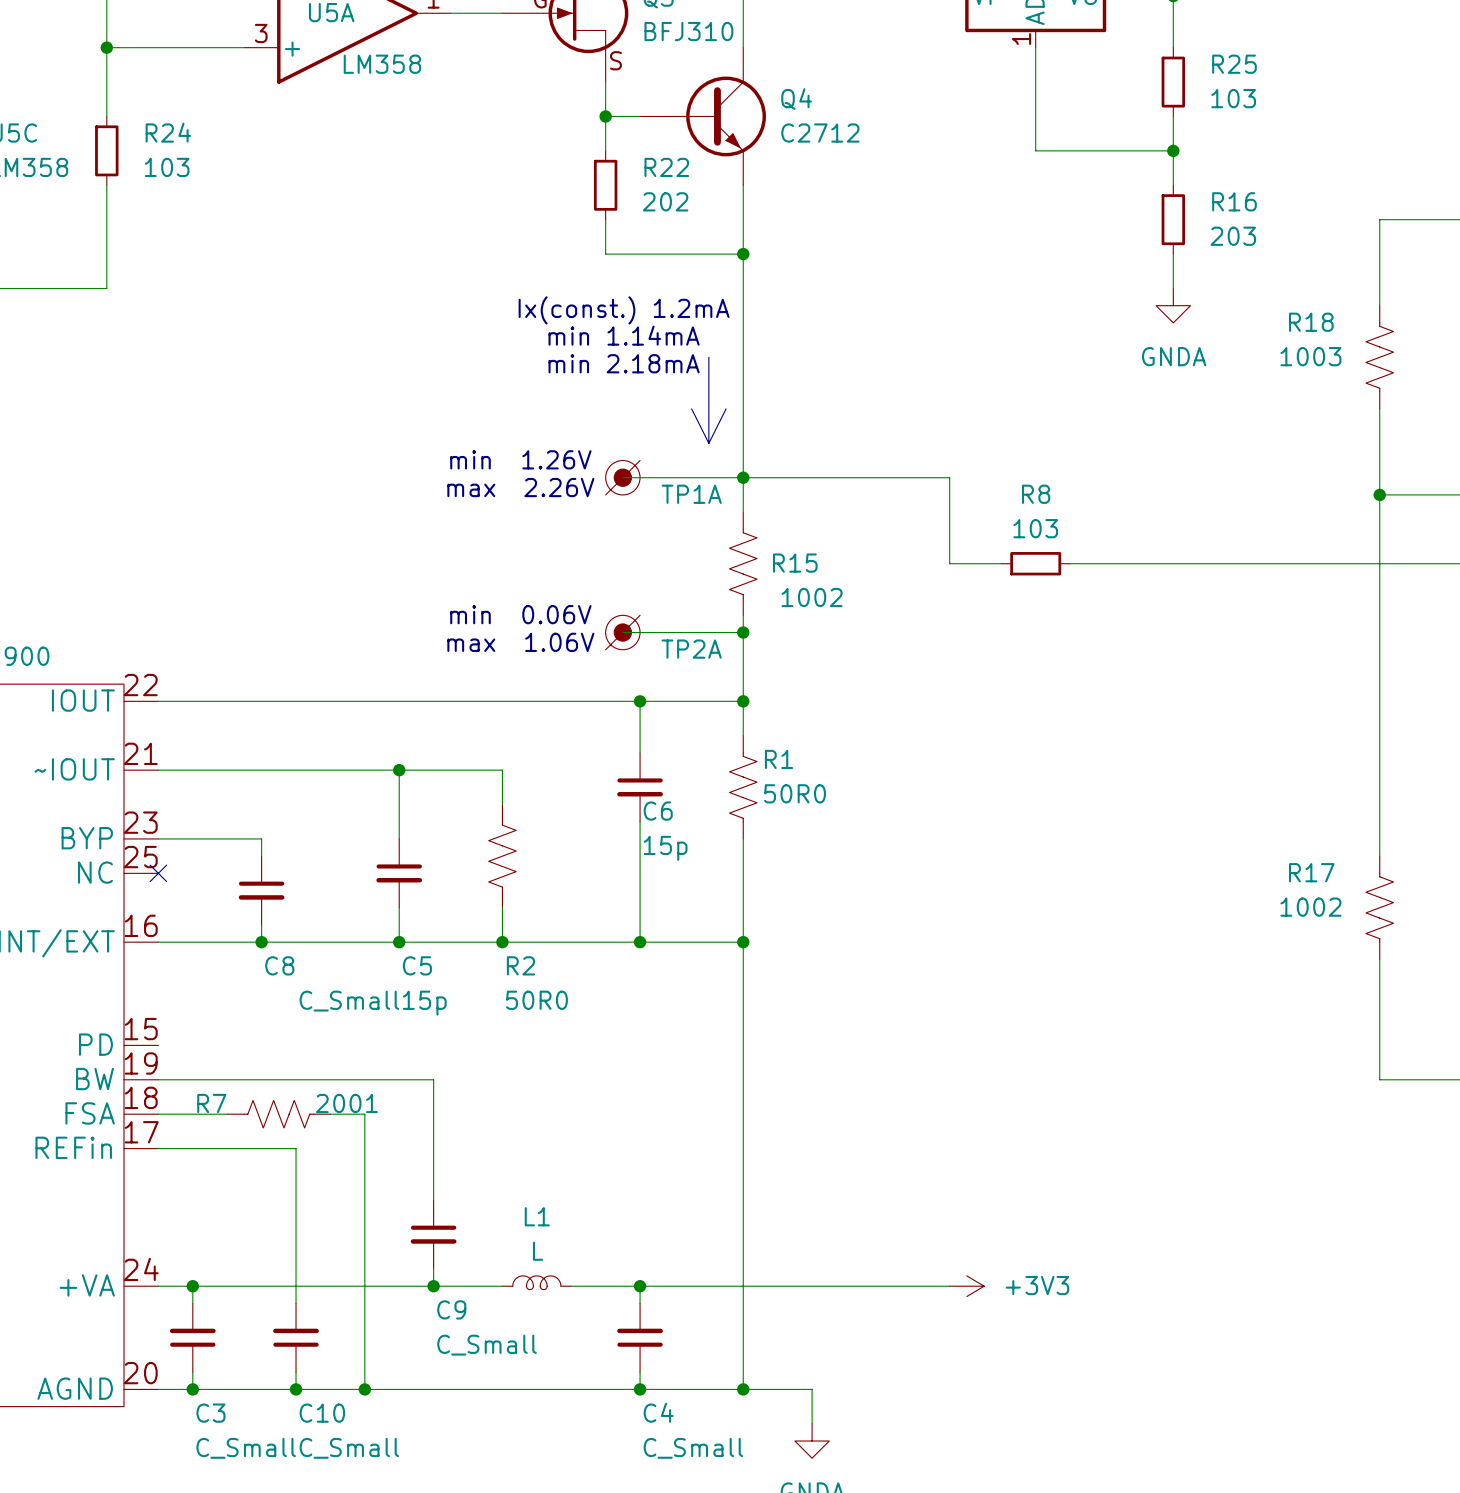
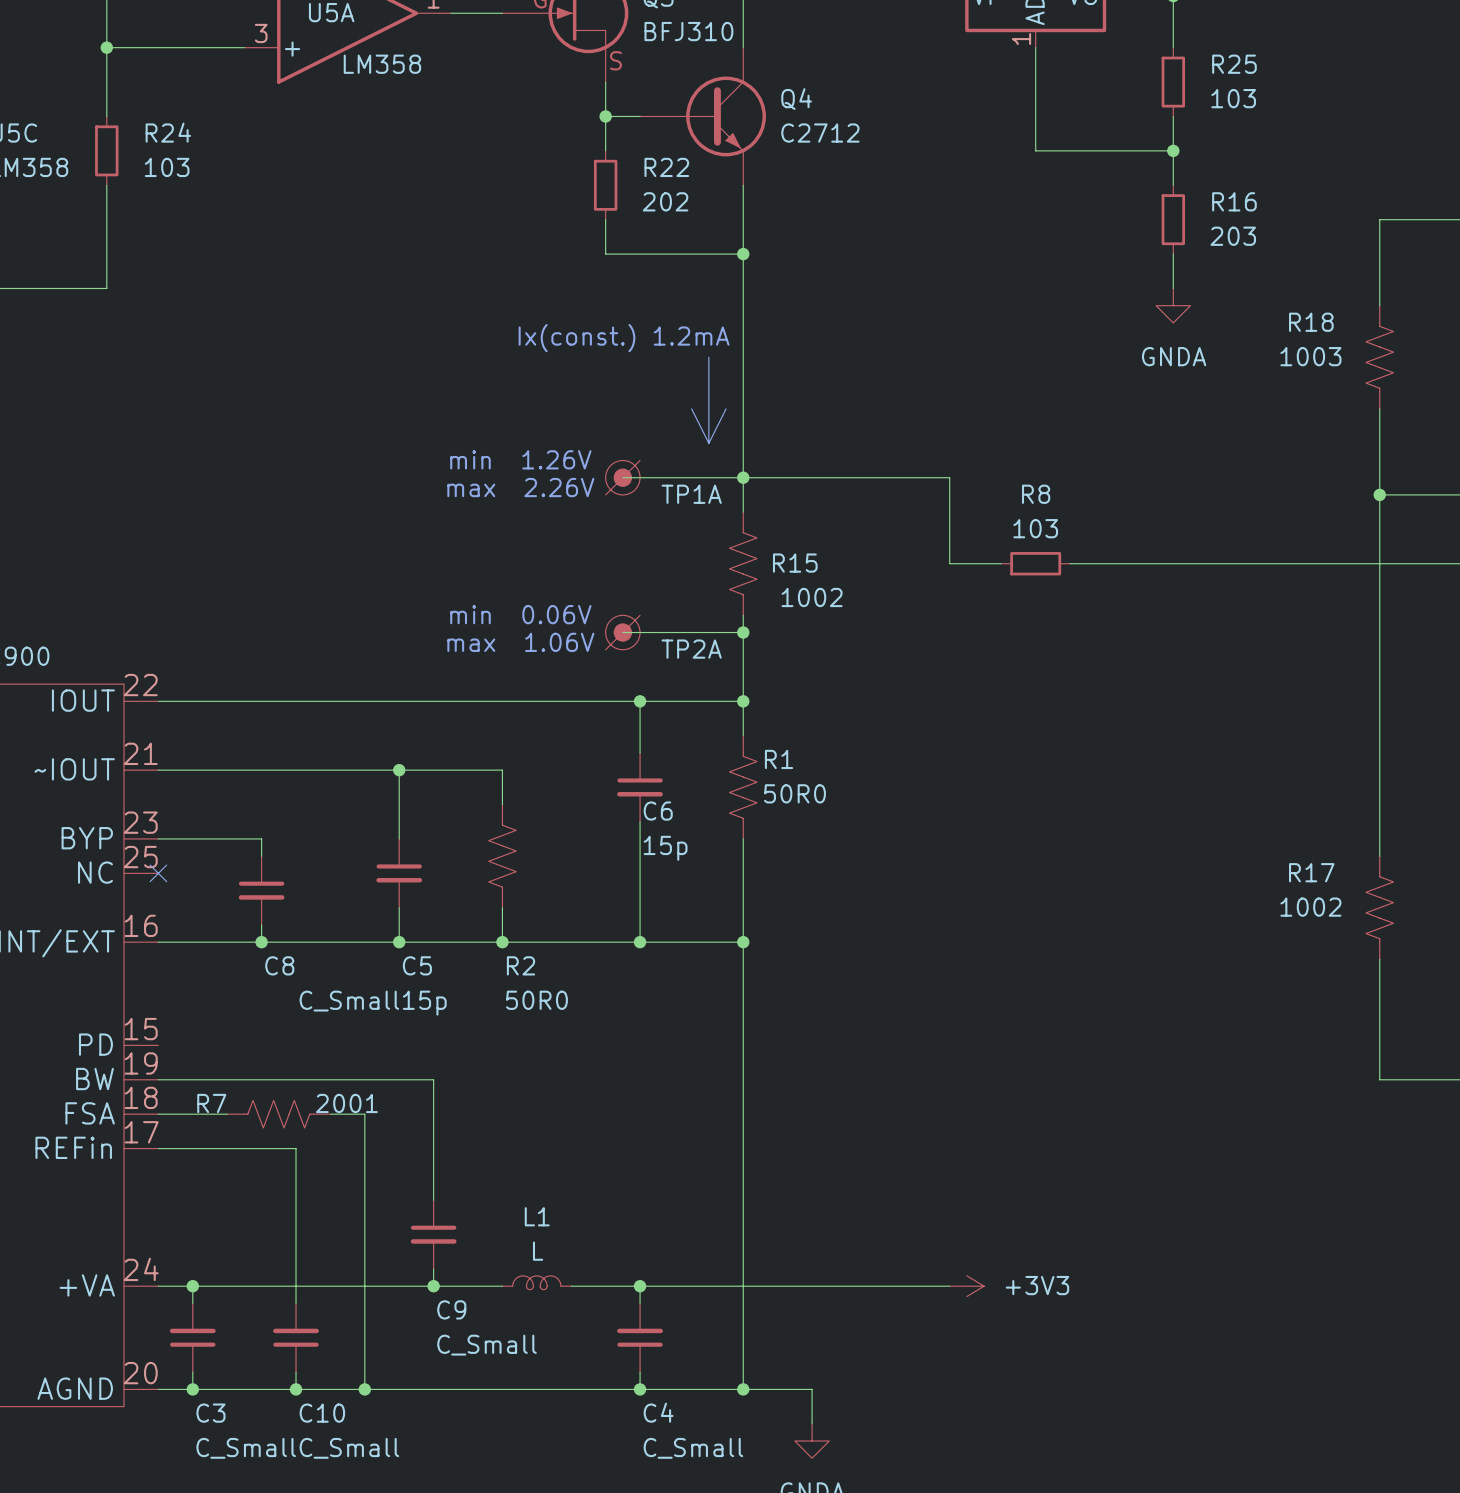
text: Ix(const.) 1.2mA (624, 310) -> none
text: min 1.14mA (624, 335) -> Ix(const.) 1.2mA (624, 338)
text: min 2.18mA (624, 363) -> none

